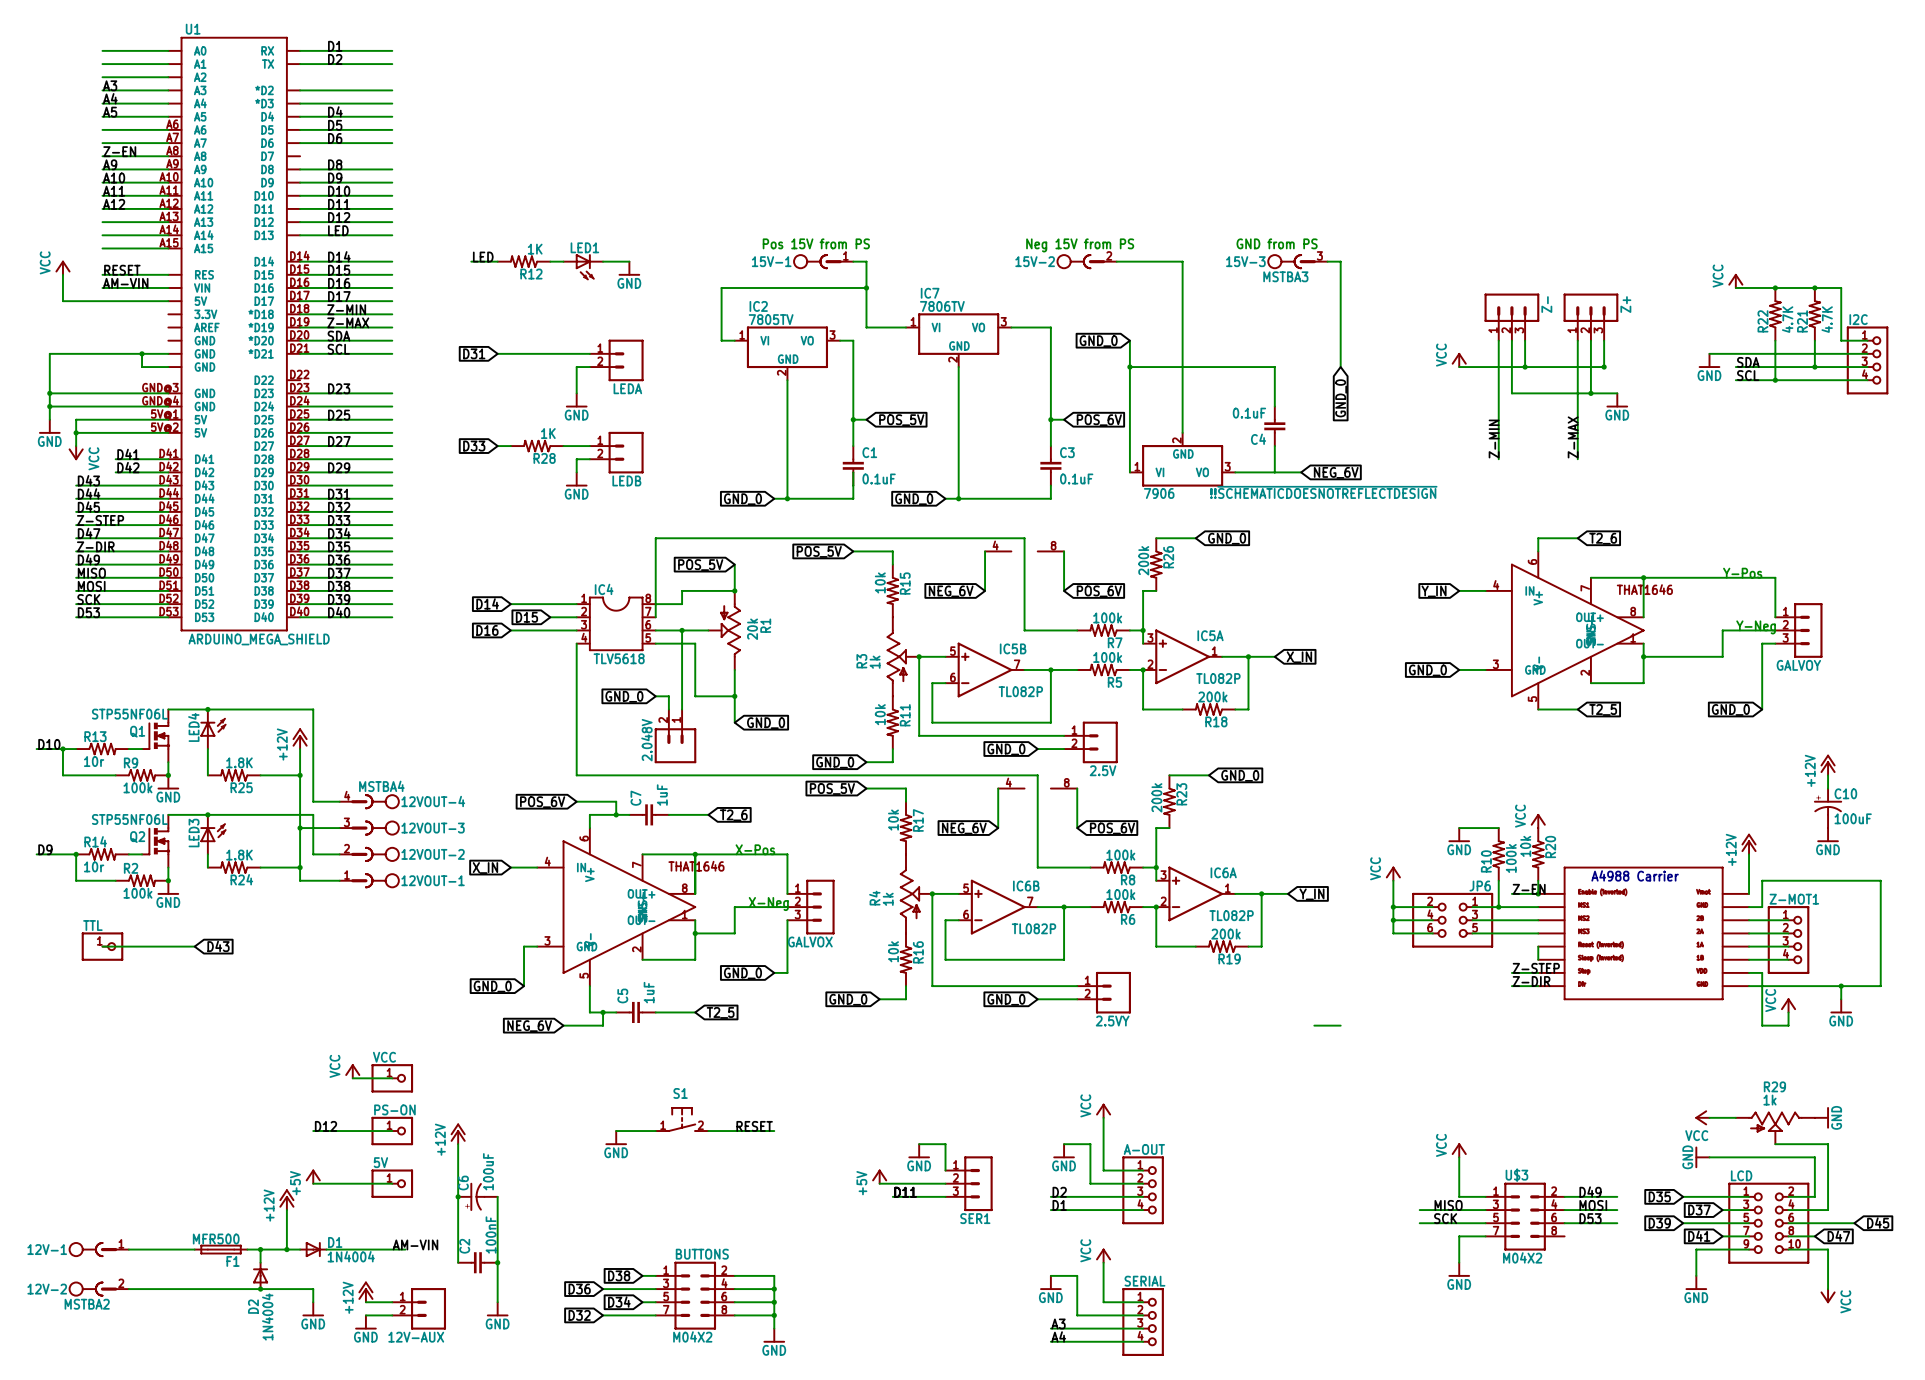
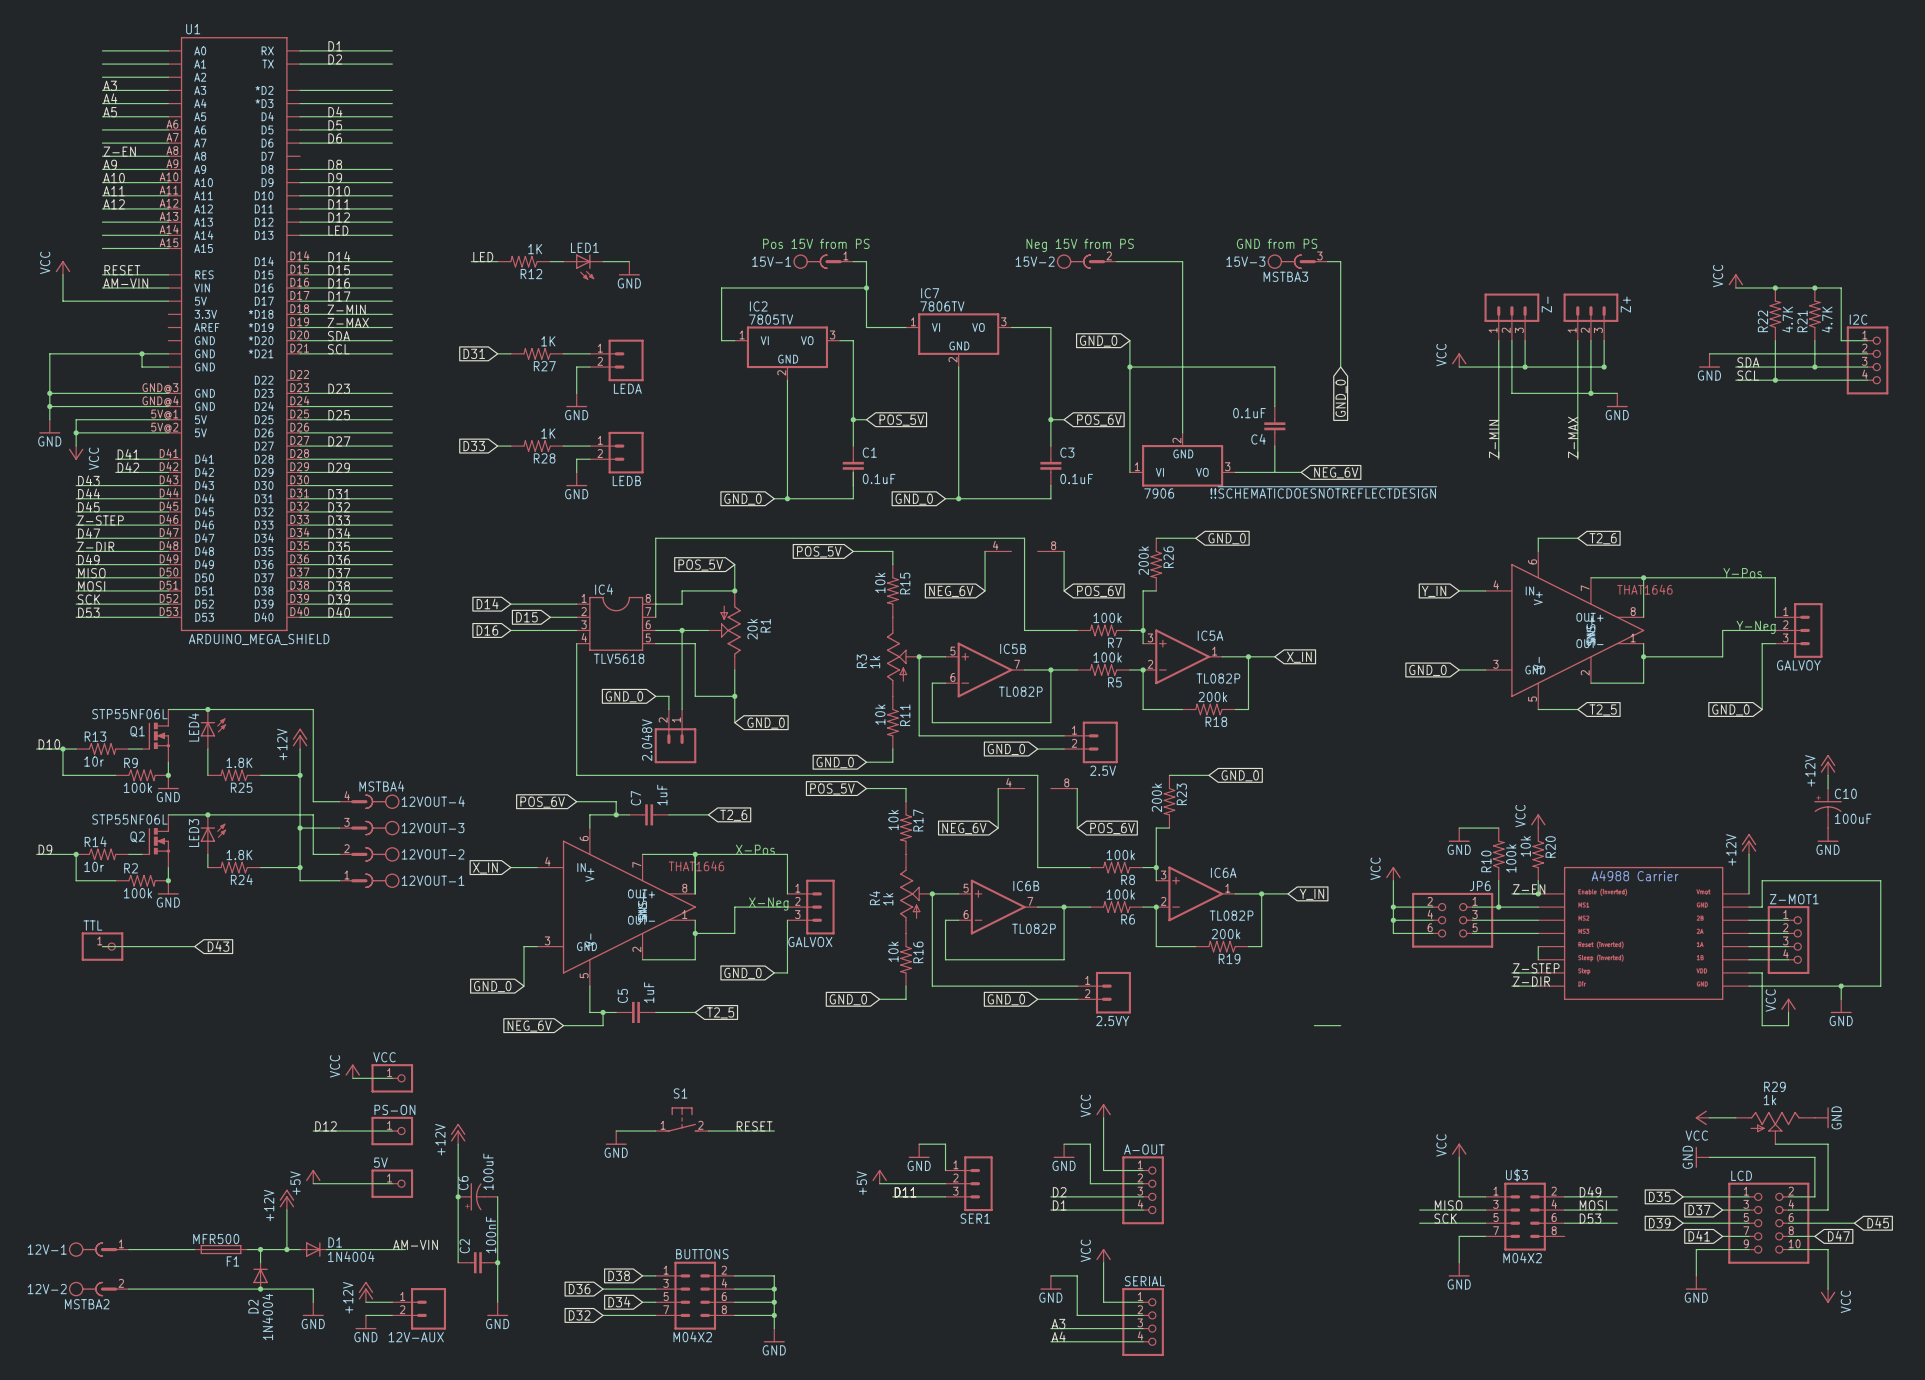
R27: none -> 1K (537, 353)

